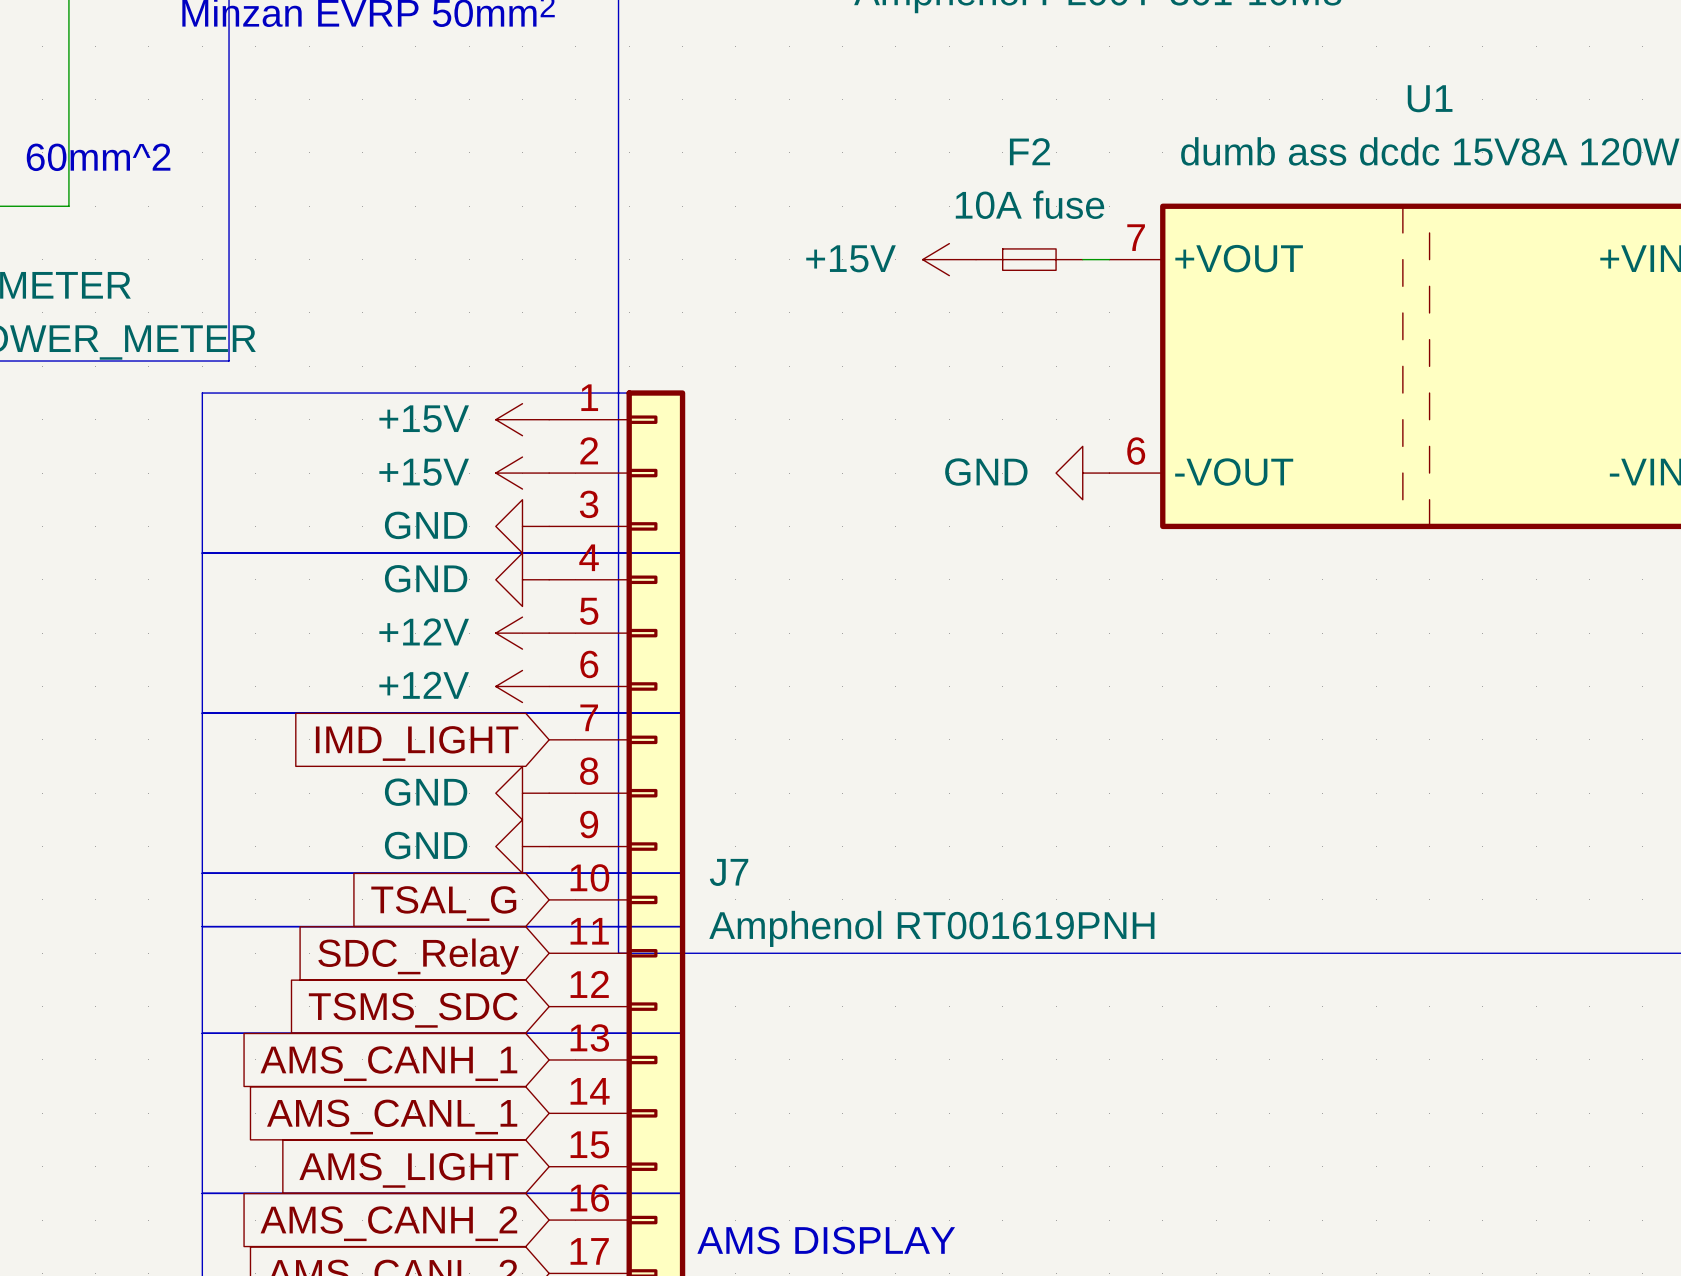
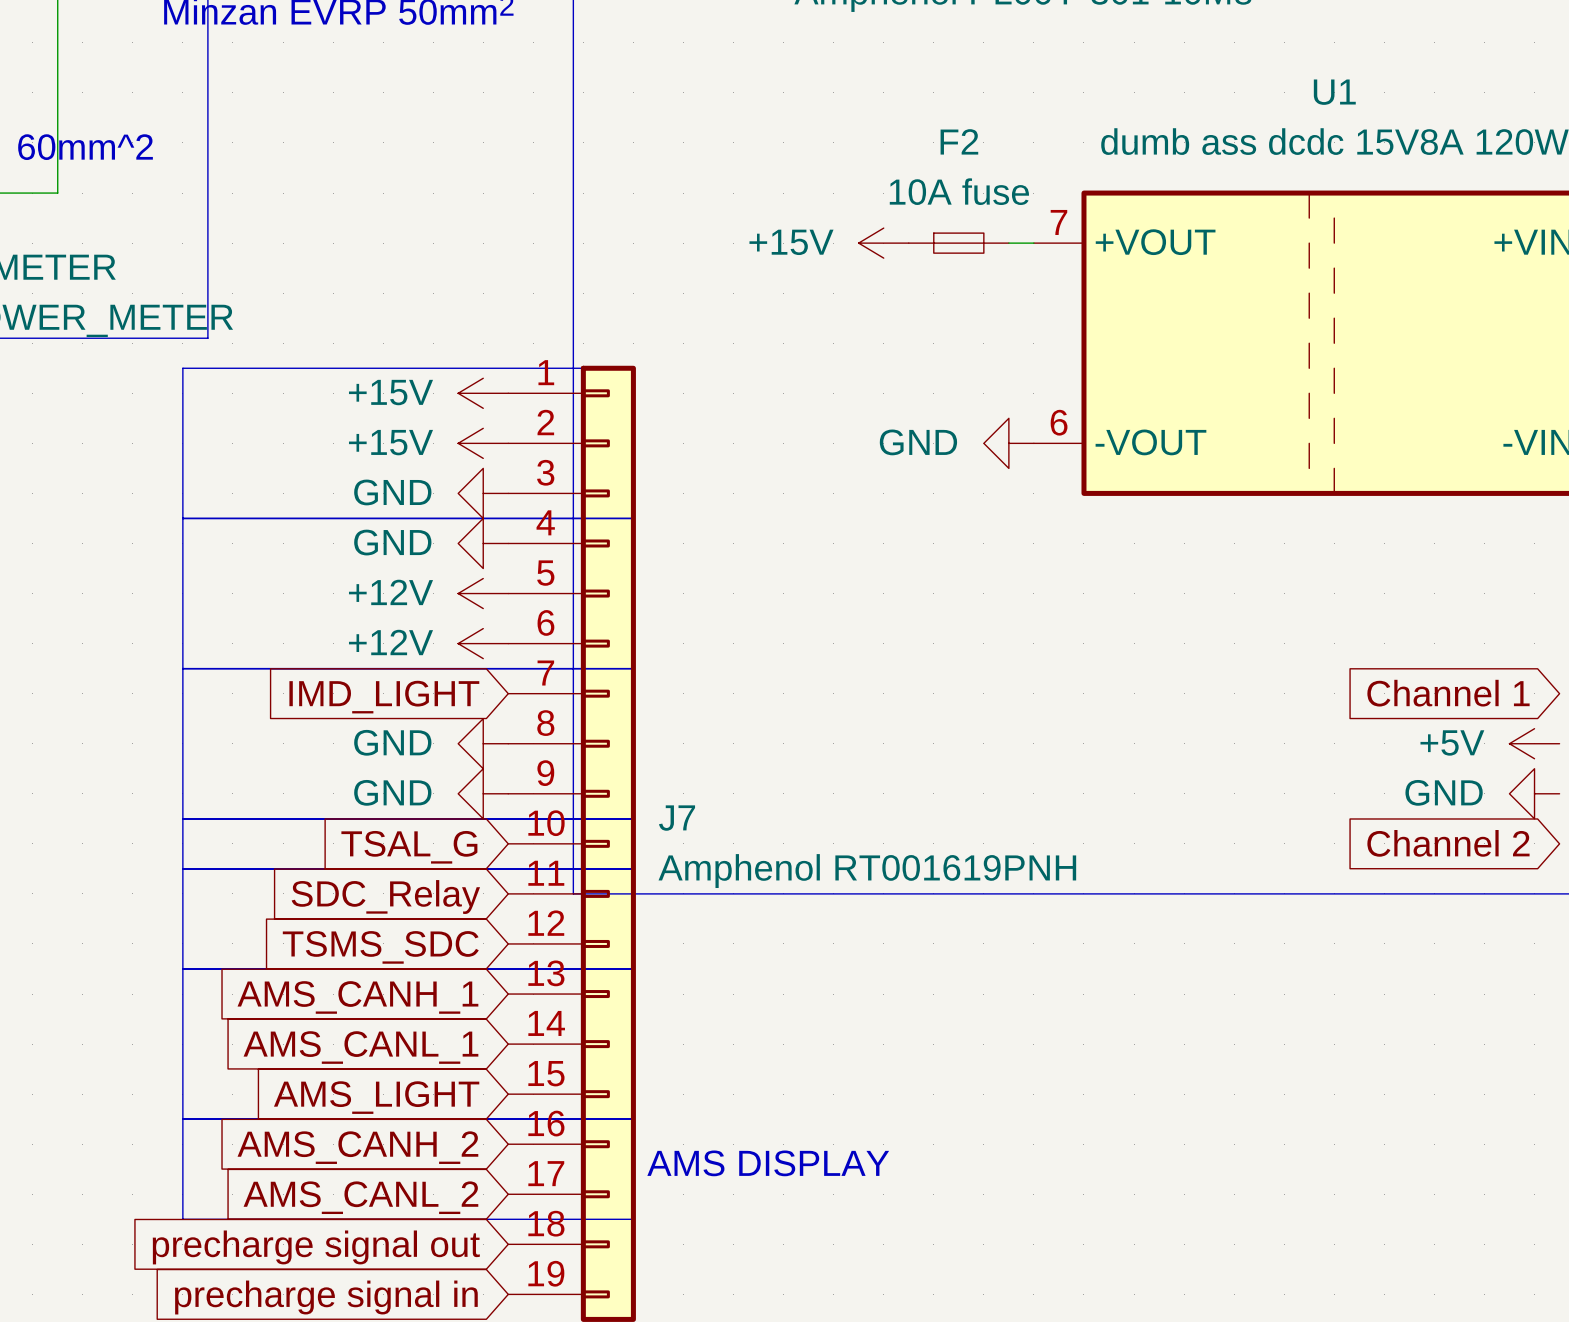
global label: none -> Channel 1 (1448, 693)
power symbol: none -> +5V (1534, 743)
power symbol: none -> GND (1534, 793)
global label: none -> Channel 2 (1448, 843)

